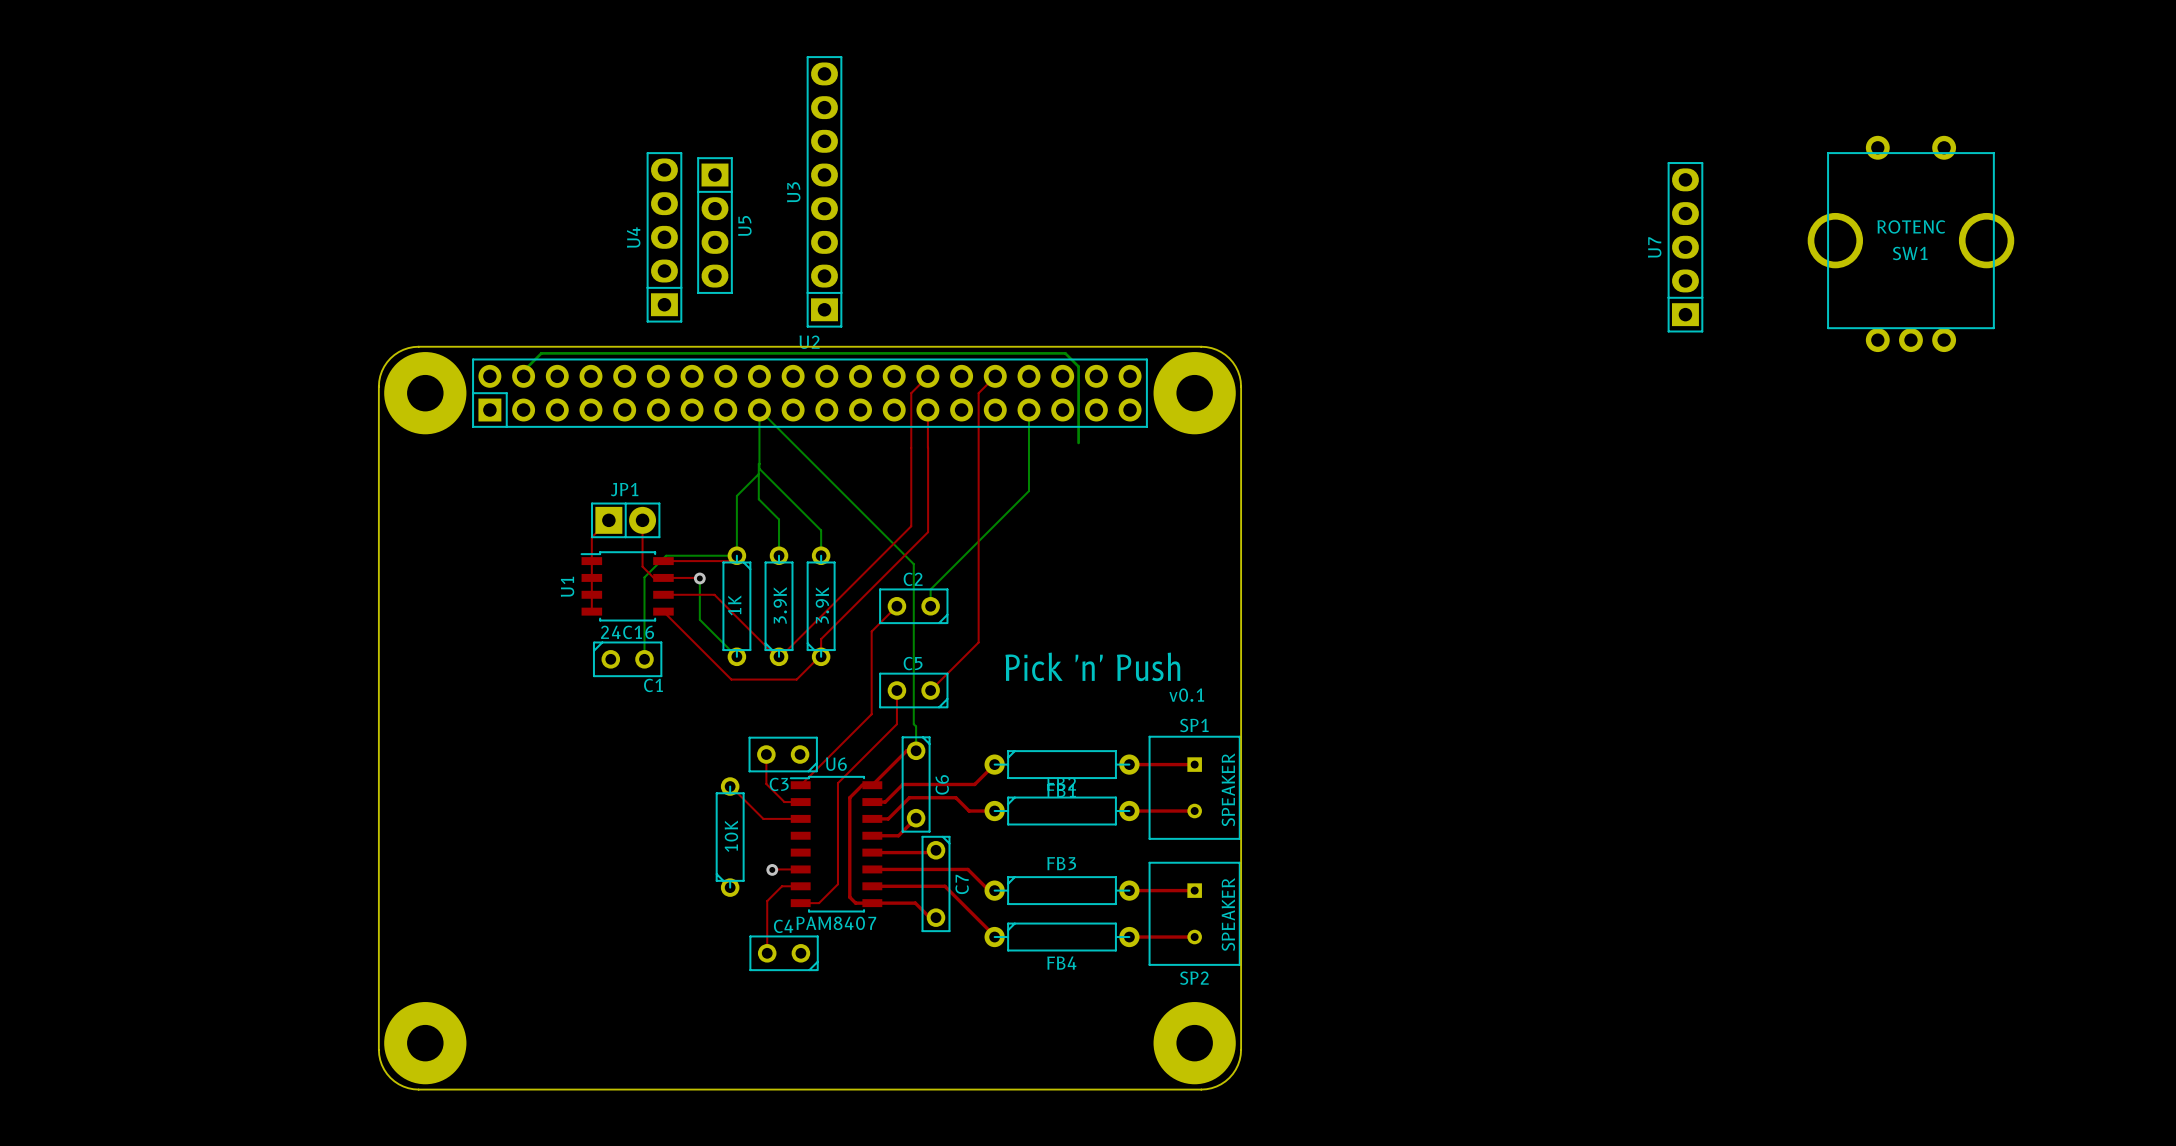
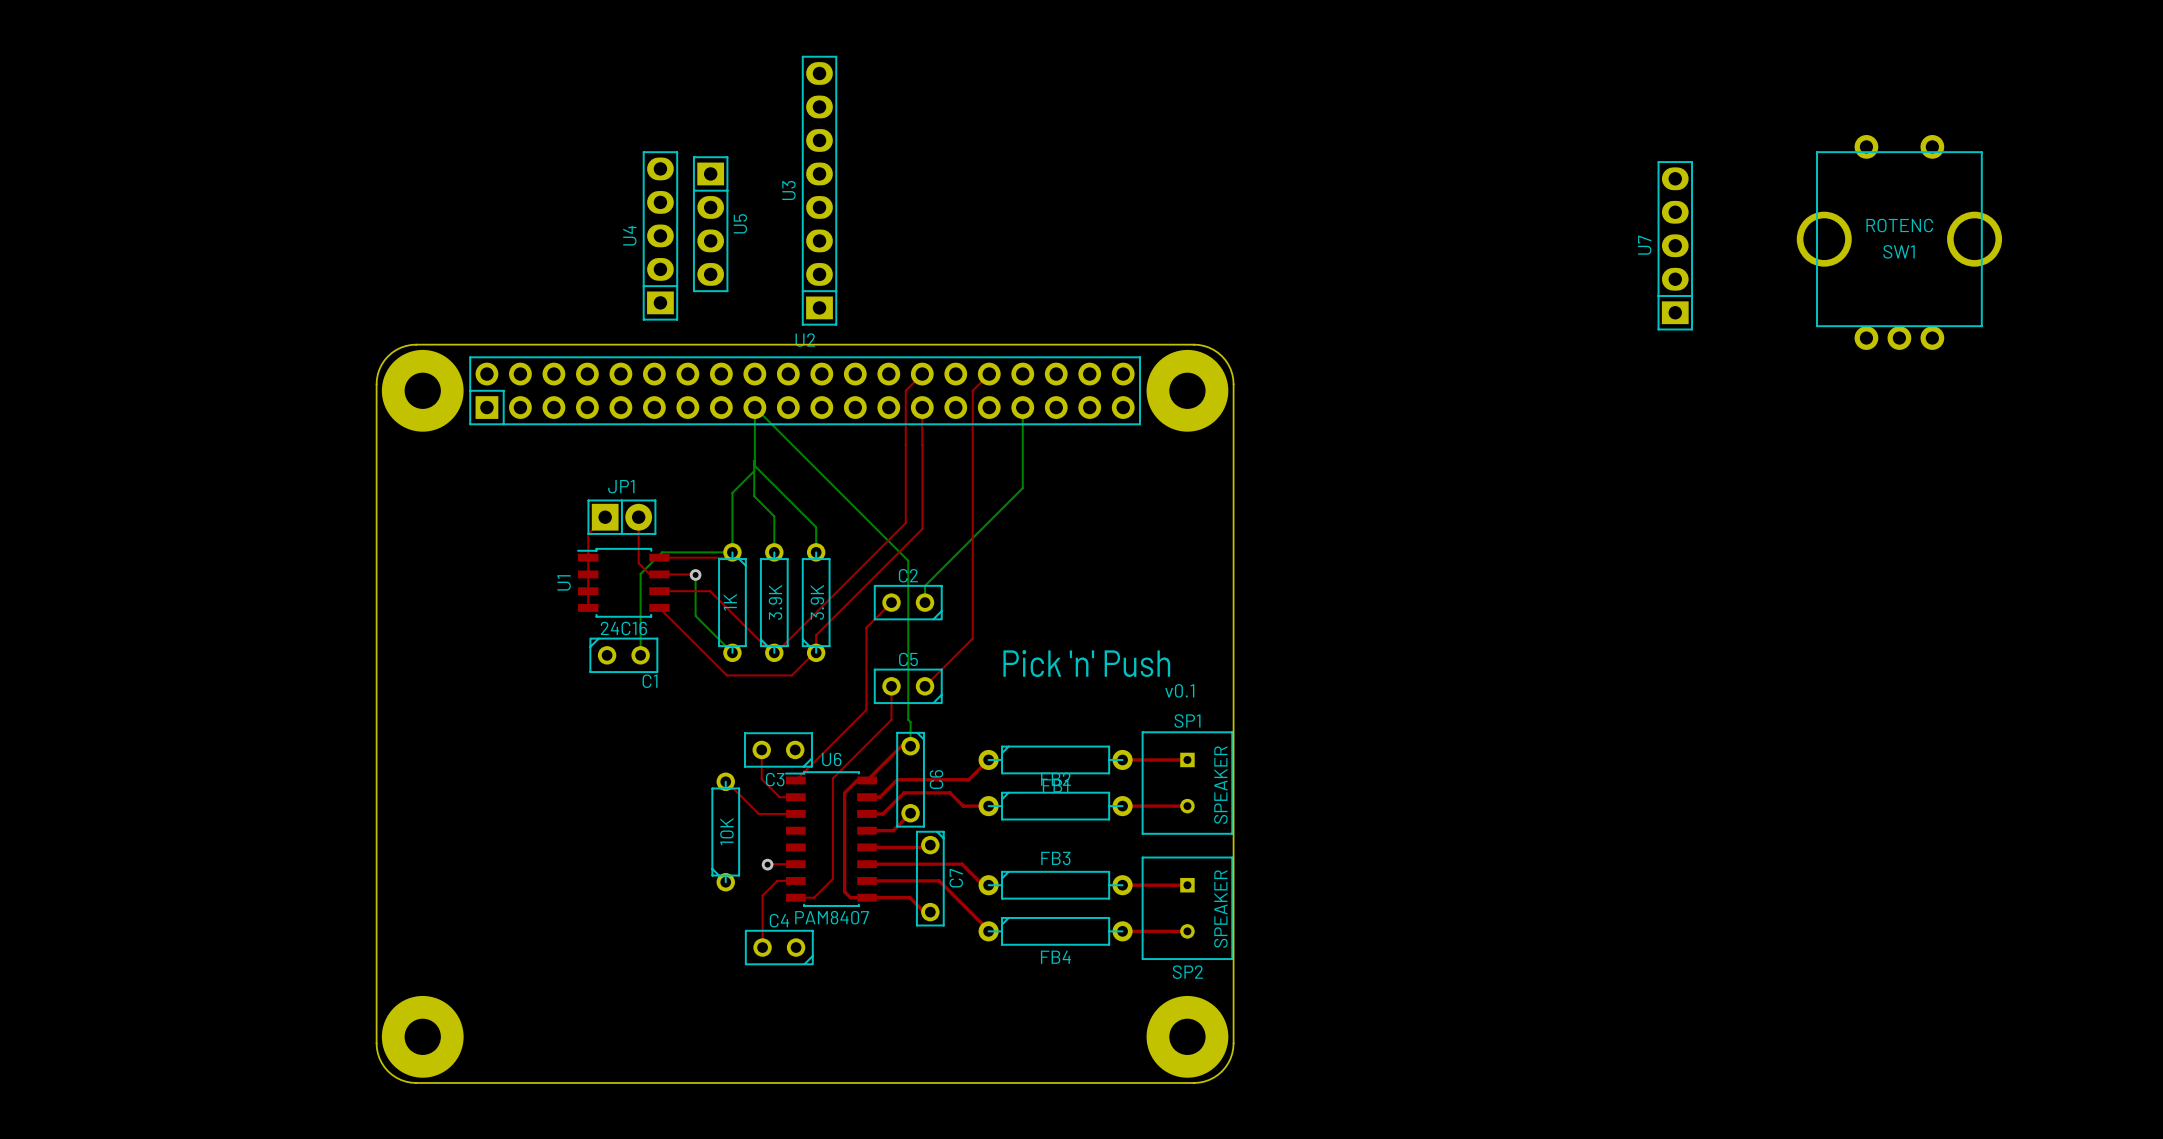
bottom track: (523, 376) (523, 371) (541, 353) (1065, 353) (1078, 366) (1078, 442) -> none

